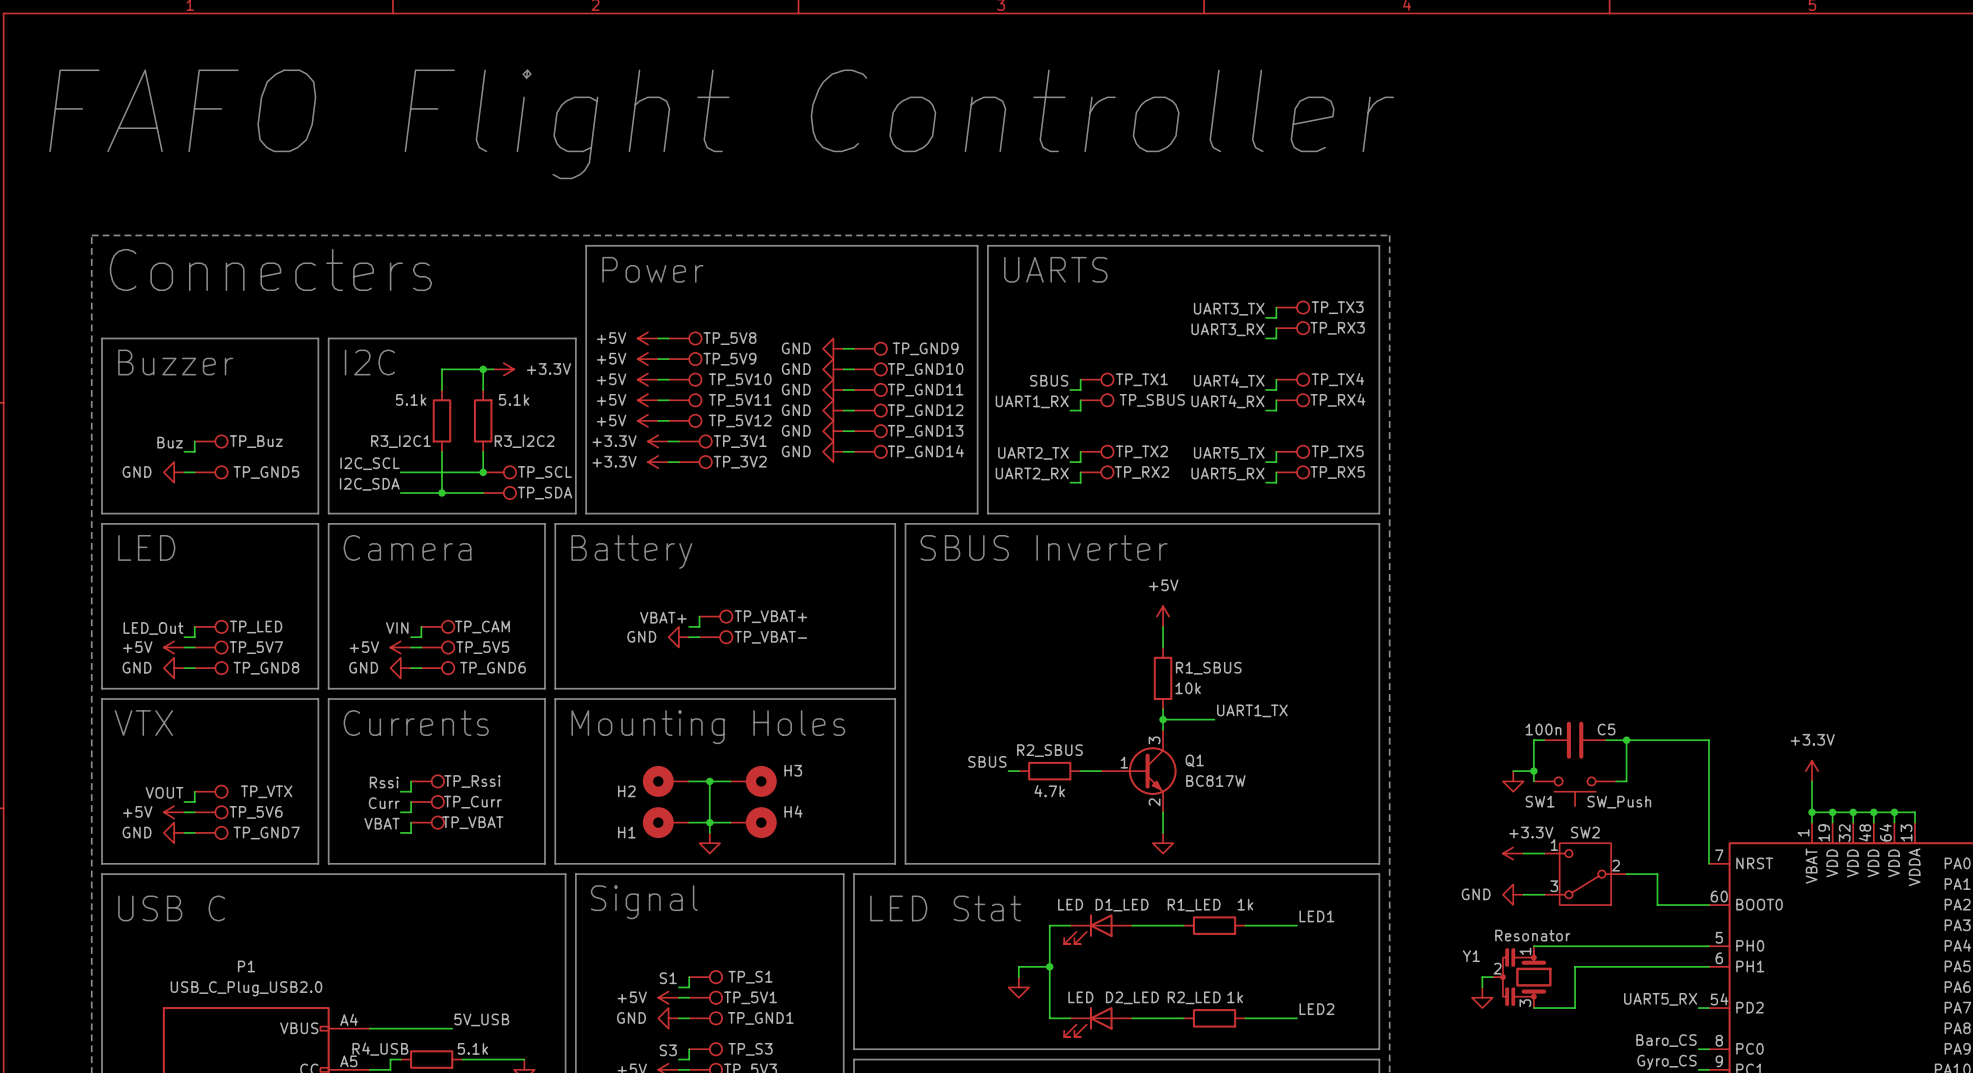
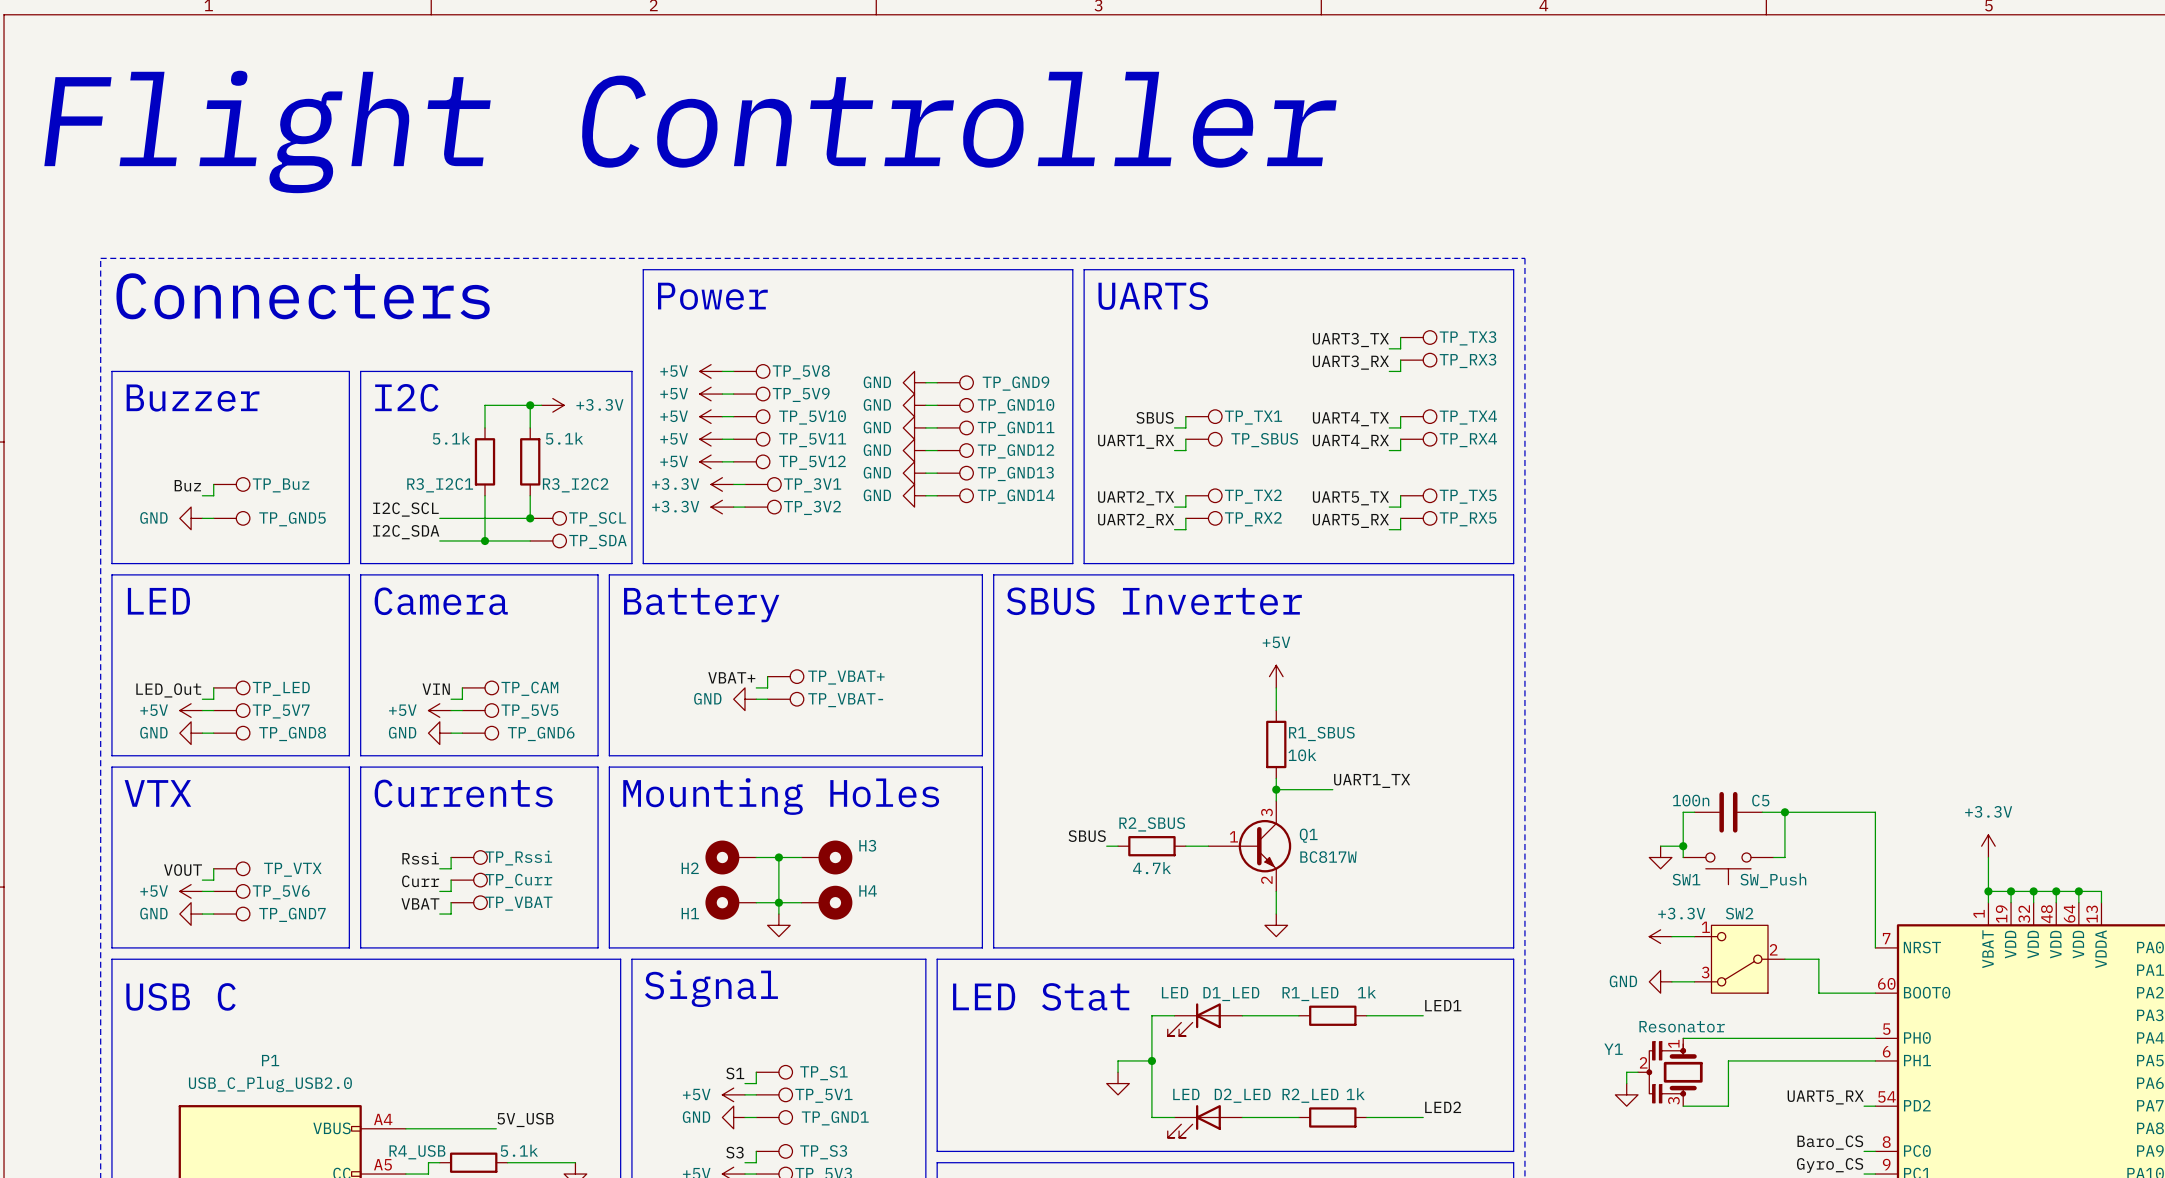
text: FAFO Flight Controller (721, 124) -> Flight Controller (690, 131)

